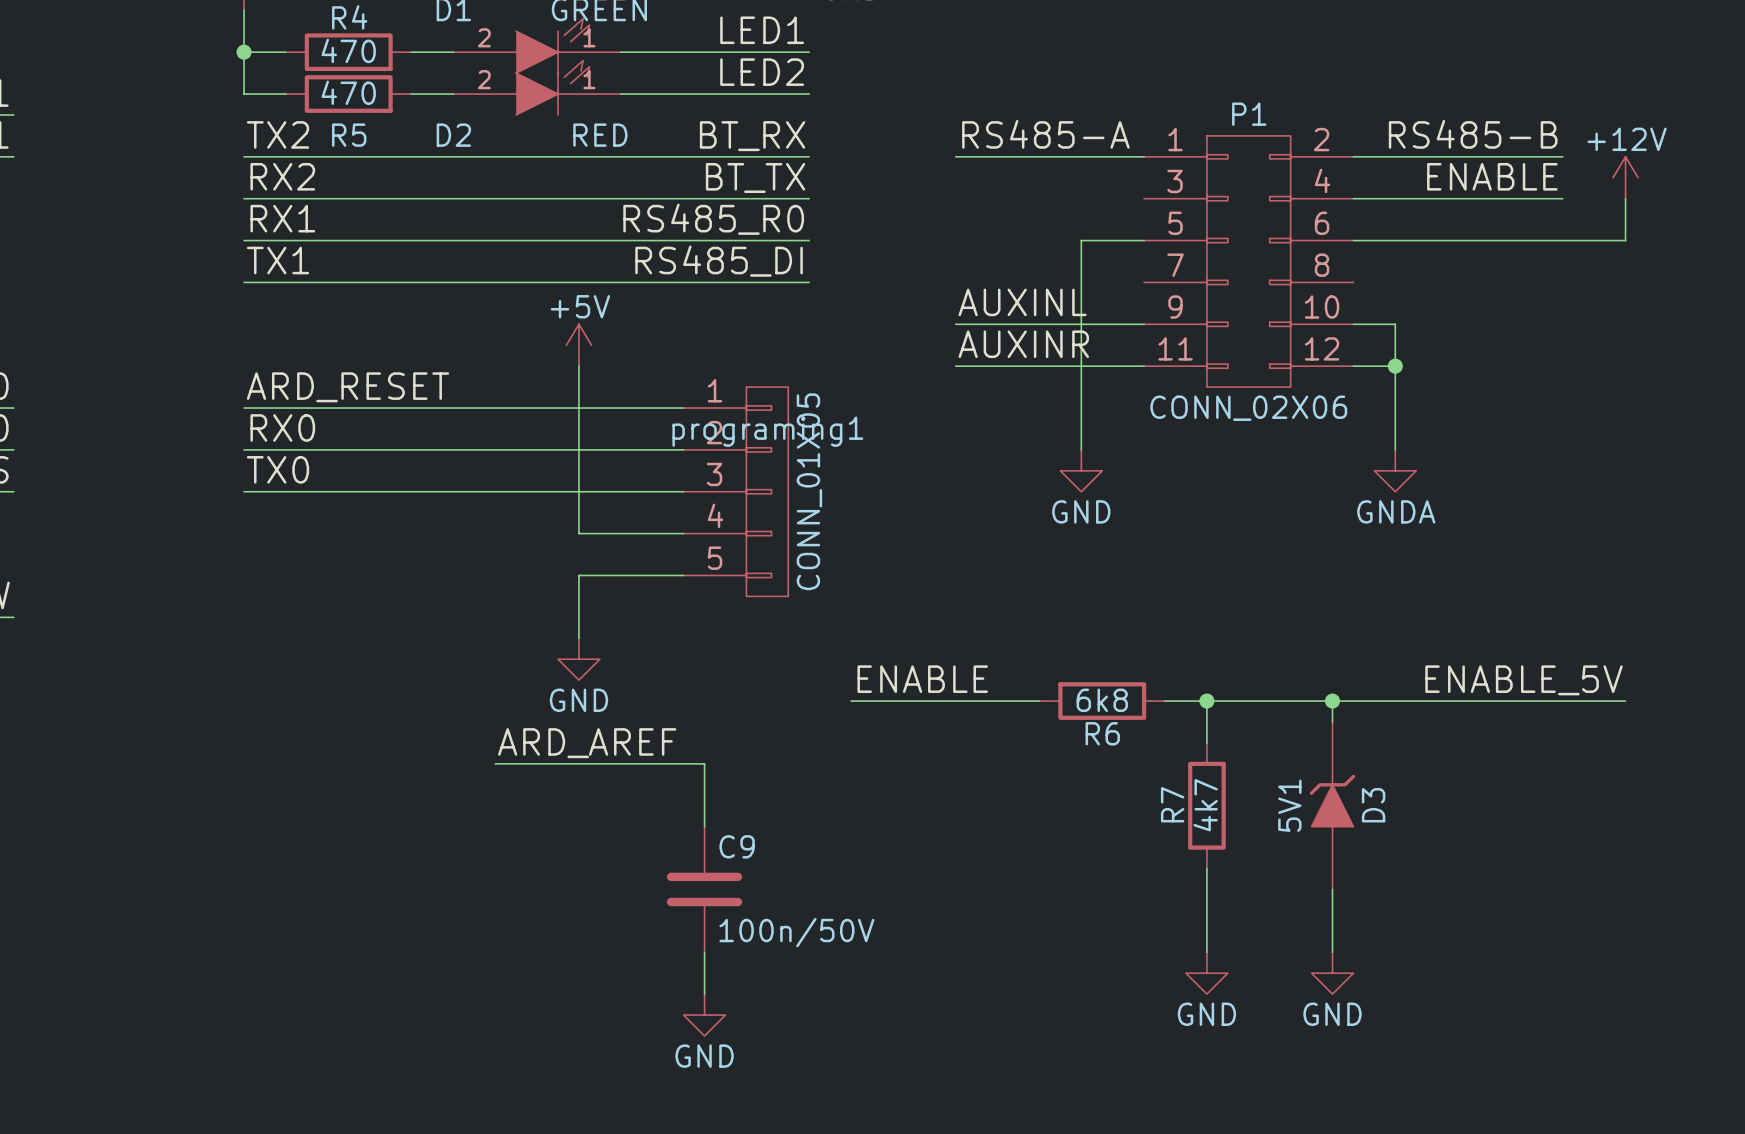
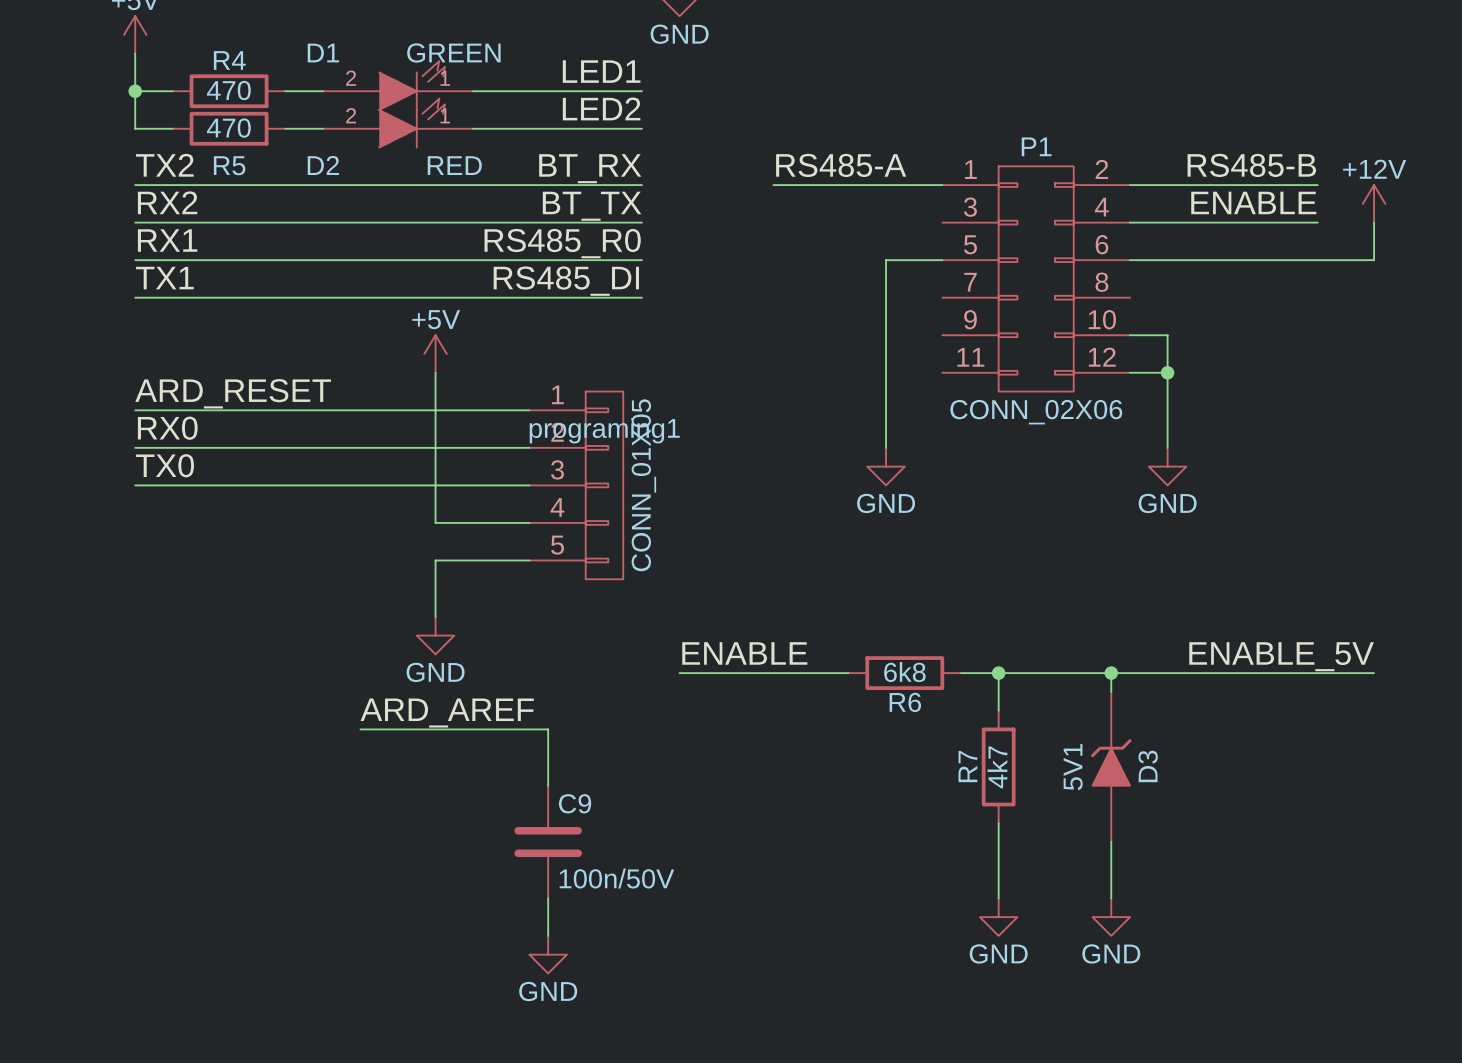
label: AUXINL (1022, 302) -> none
wire: (955, 324) (1144, 324) -> none
label: AUXINR (1023, 344) -> none
wire: (955, 366) (1144, 366) -> none
power symbol: GNDA (1395, 470) -> GND (1167, 466)

